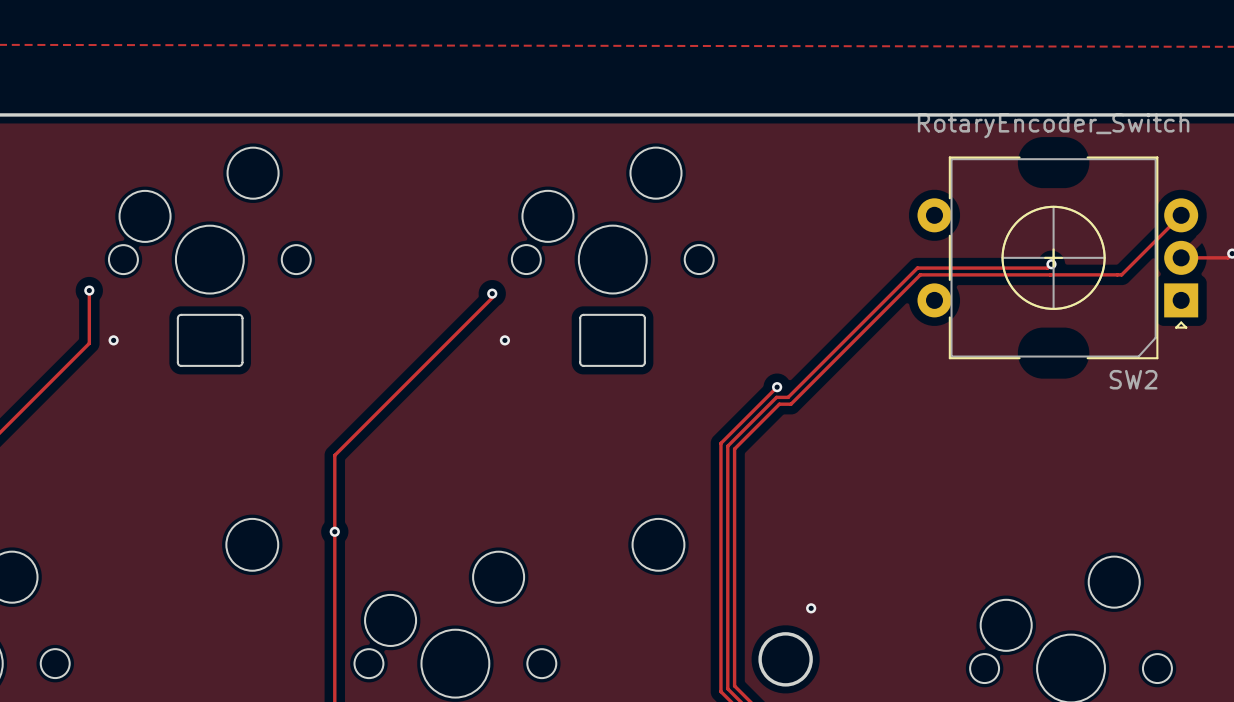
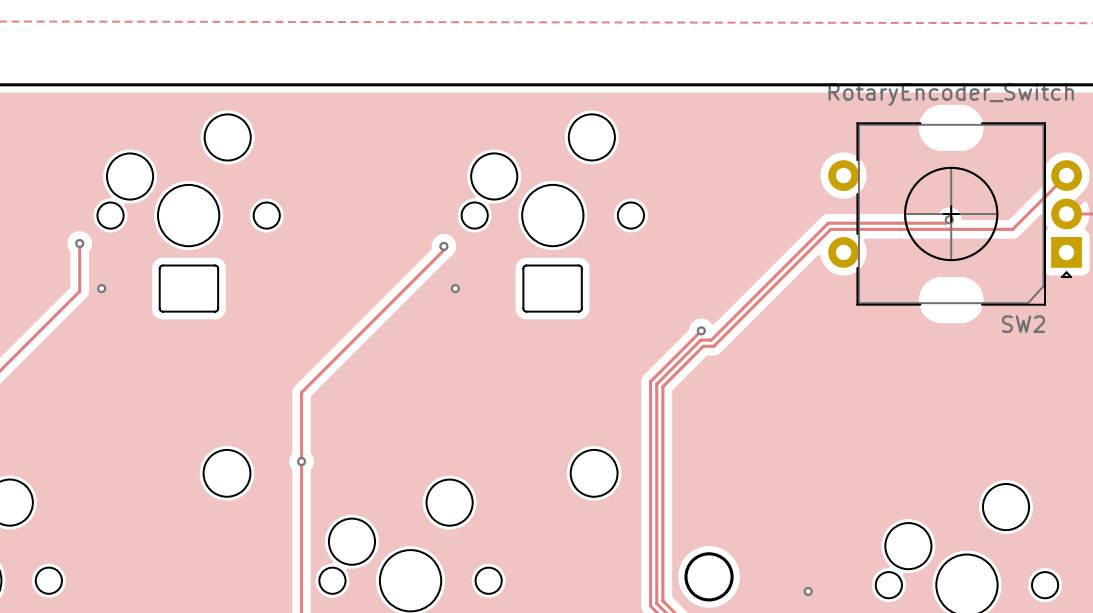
via: (811, 608) -> none
via: none -> (808, 591)

